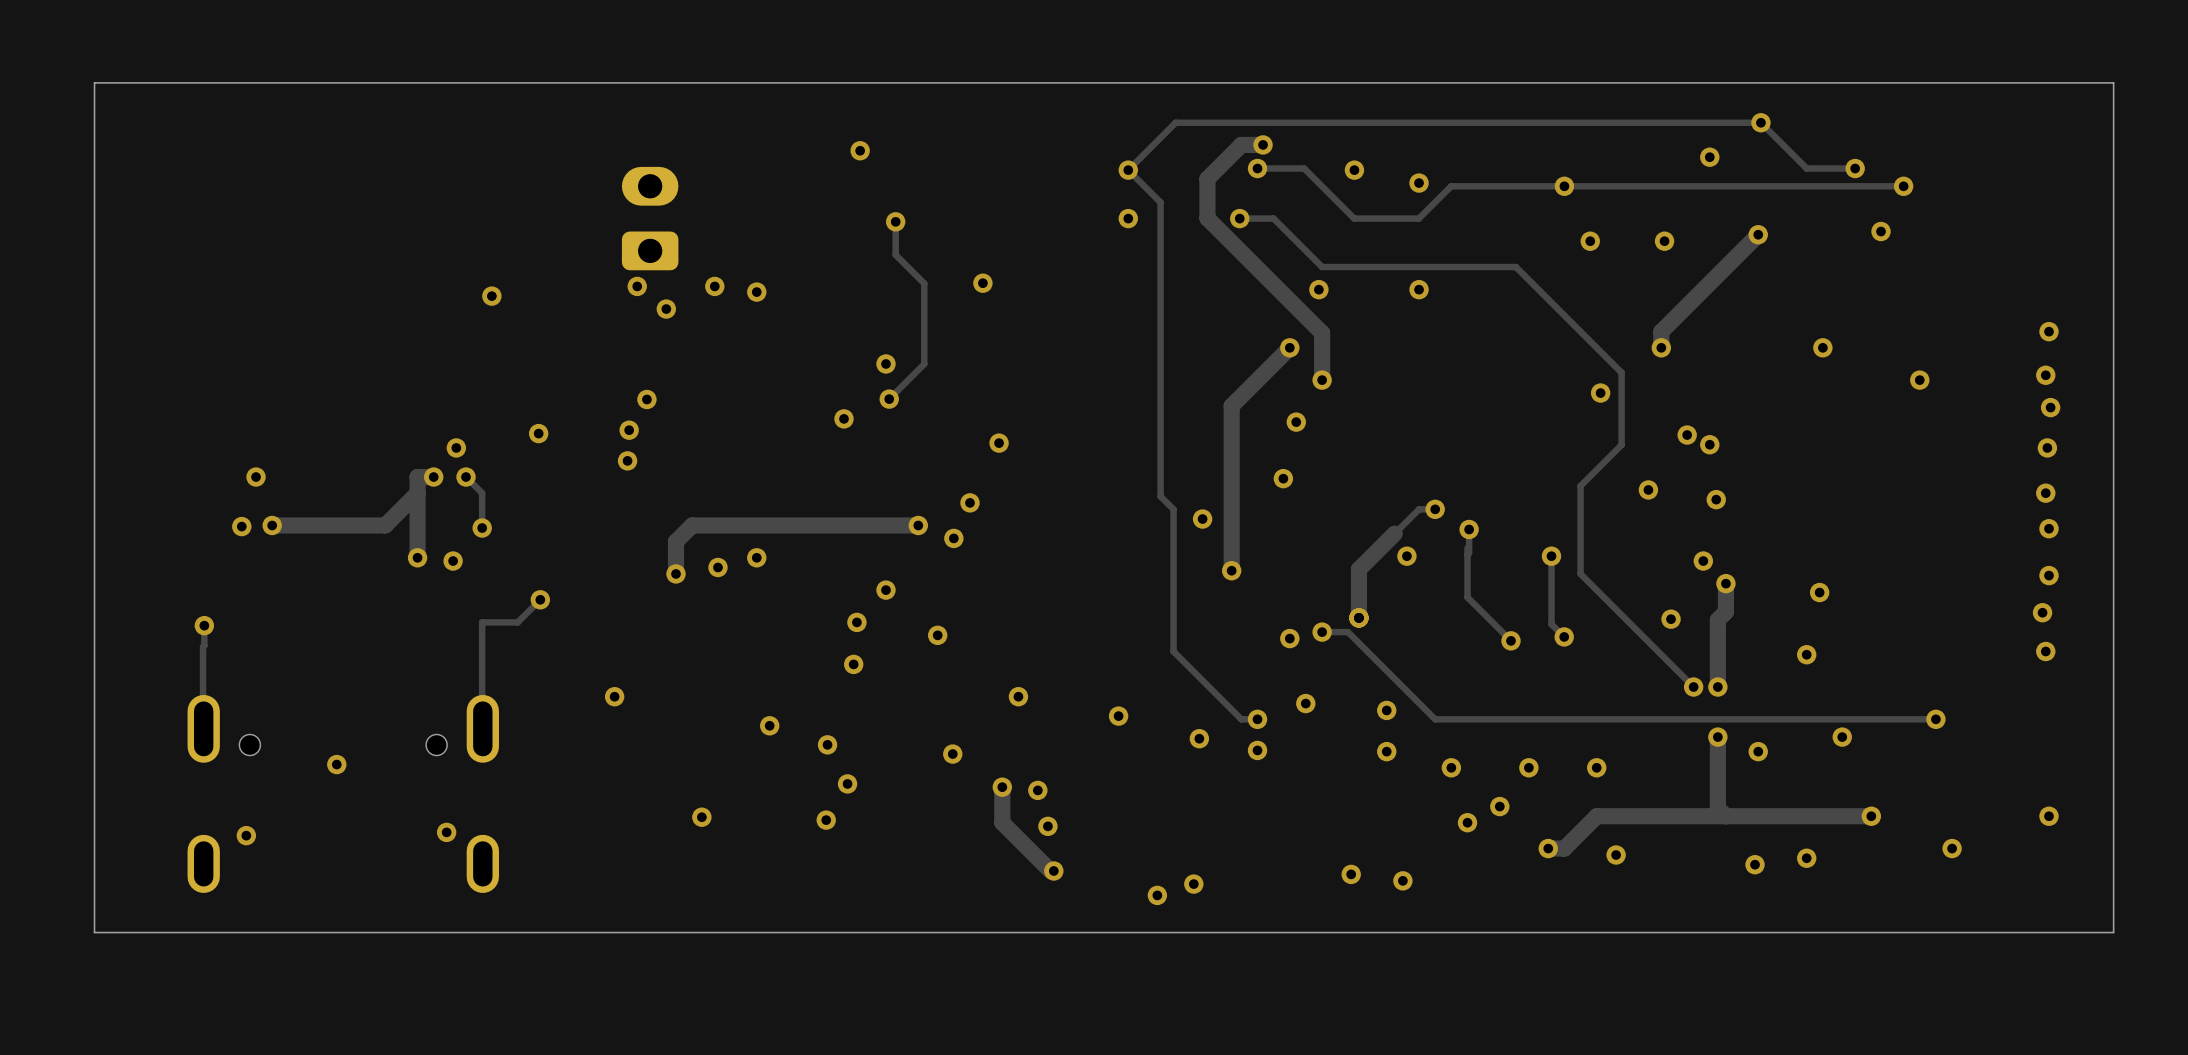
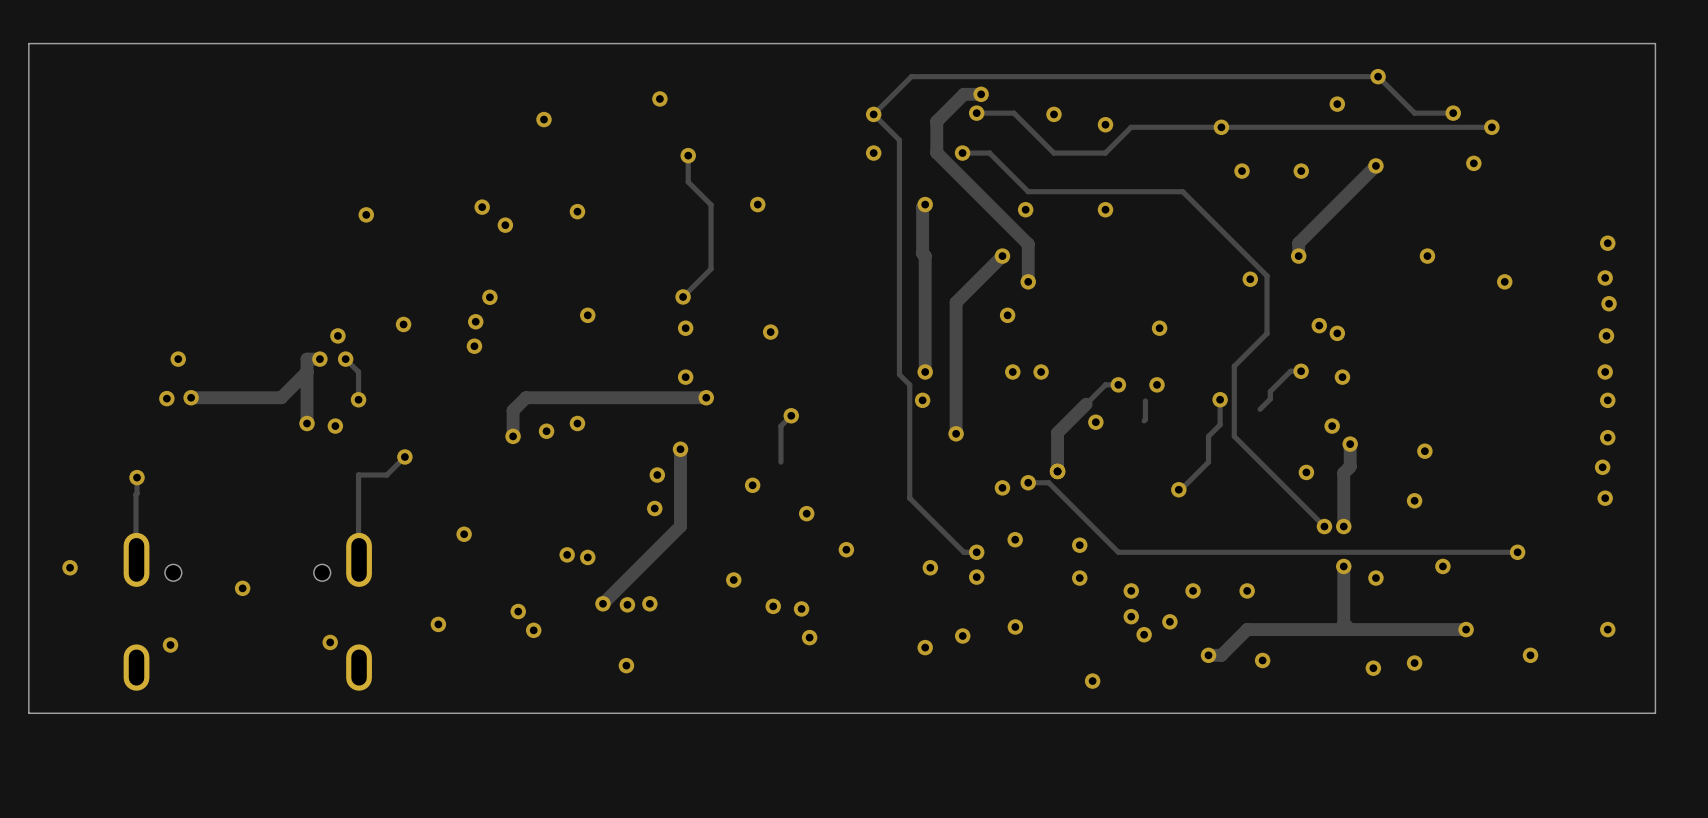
board edge: (2113, 82) (94, 82) (94, 932) (2113, 932) (2113, 82) -> (1655, 43) (1655, 713) (28, 713) (28, 43) (1655, 43)
via: none -> (543, 119)
part: (650, 218) -> none
track: none -> (925, 204) (922, 207) (922, 253) (925, 256) (925, 371)
via: none -> (925, 204)
via: (714, 286) -> none
via: (886, 363) -> none
via position: (1600, 393) -> (1250, 279)
via: (844, 418) -> none
via: none -> (587, 315)
via: none -> (685, 328)
via: none -> (1159, 328)
via position: (1283, 478) -> (1012, 371)
via position: (1648, 489) -> (1301, 371)
track: none -> (1301, 371) (1290, 371) (1270, 391) (1270, 399) (1260, 409)
via: none -> (925, 371)
via: none -> (1041, 371)
via: none -> (685, 377)
via: (969, 502) -> none
via position: (1202, 519) -> (922, 400)
via position: (1469, 529) -> (1157, 384)
via: (953, 538) -> none
track: none -> (791, 415) (780, 426) (780, 462)
via: none -> (791, 415)
track: (1467, 548) (1467, 597) (1511, 640) -> (1220, 399) (1220, 424) (1208, 436) (1208, 462) (1178, 489)
track: (1551, 556) (1551, 624) (1564, 636) -> none
via position: (1551, 556) -> (1220, 399)
track: none -> (680, 449) (680, 526) (602, 603)
via: (937, 635) -> none
via: none -> (752, 485)
via: (1564, 636) -> none
via position: (1018, 696) -> (806, 513)
via position: (1118, 716) -> (846, 549)
via: none -> (567, 554)
via: none -> (70, 567)
via: (827, 744) -> none
via: none -> (602, 603)
via: none -> (627, 604)
track: (1002, 787) (1002, 822) (1050, 871) (1053, 871) -> none
via: none -> (518, 611)
via: none -> (1131, 616)
via: none -> (438, 624)
via: none -> (1015, 626)
via: (826, 820) -> none
via: none -> (962, 636)
via: none -> (925, 647)
via: none -> (626, 665)
via: (1053, 871) -> none
via: (1351, 874) -> none
via: (1193, 884) -> none
via: (1157, 895) -> none

